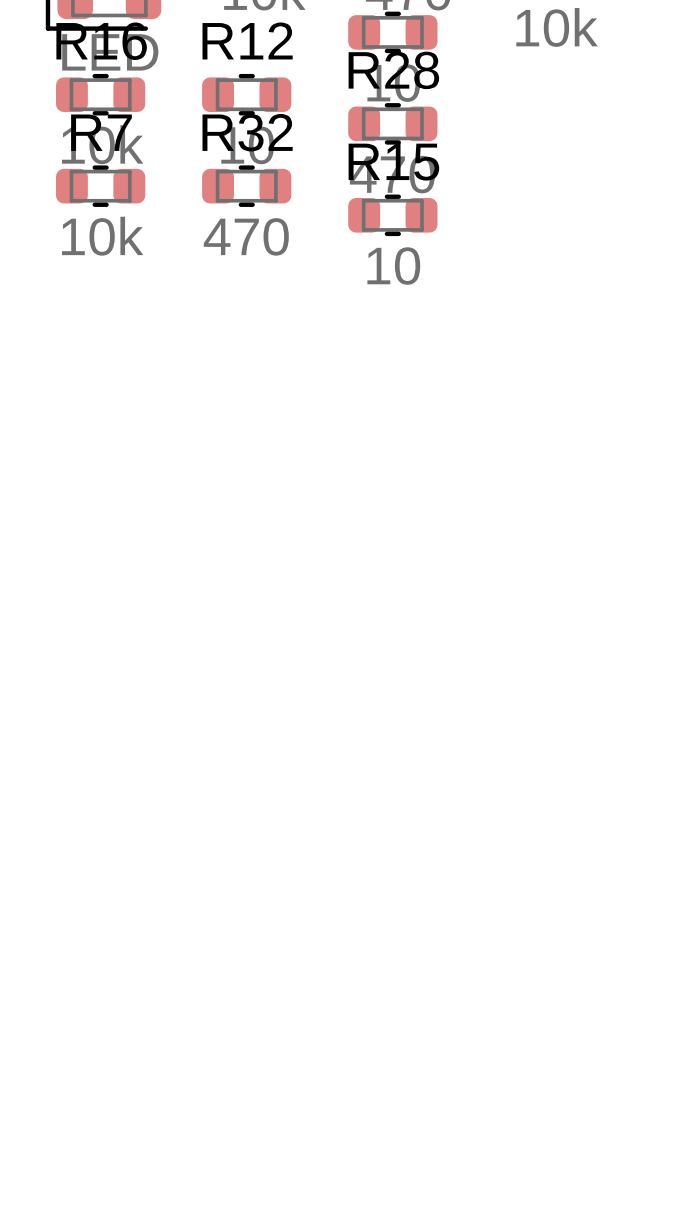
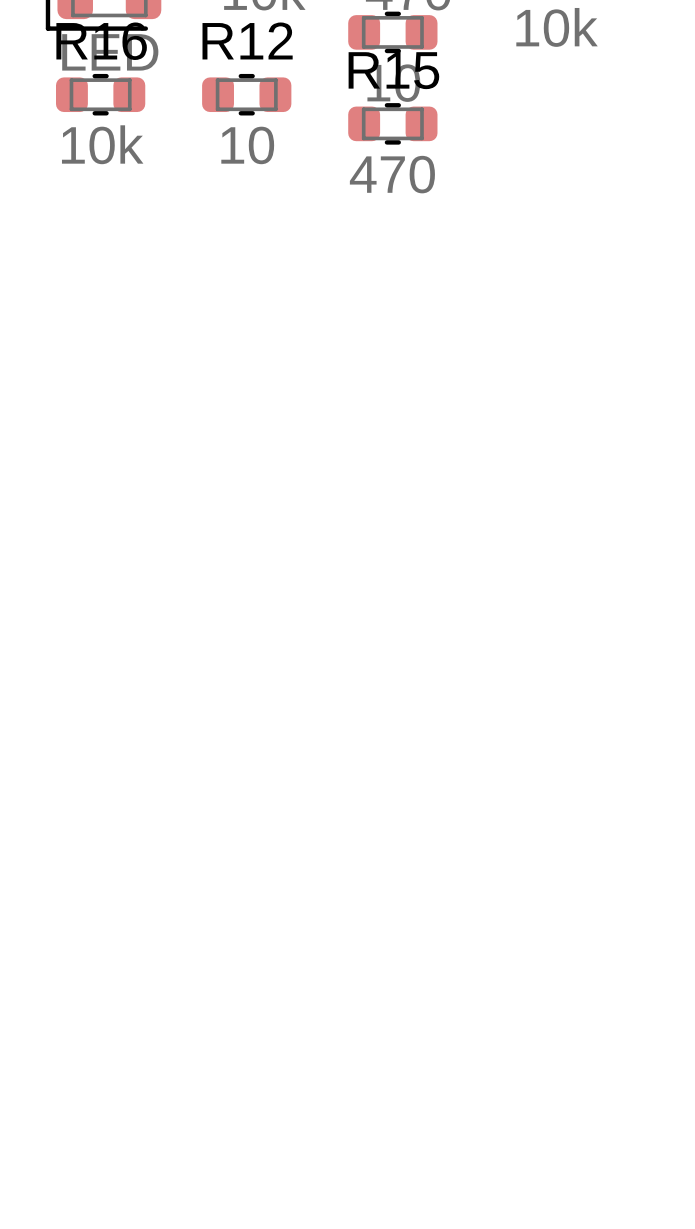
R28 name: R28 (393, 70) -> R15 (393, 70)
R7: 10k (100, 186) -> none
R32: 470 (246, 186) -> none
R15: 10 (392, 215) -> none

